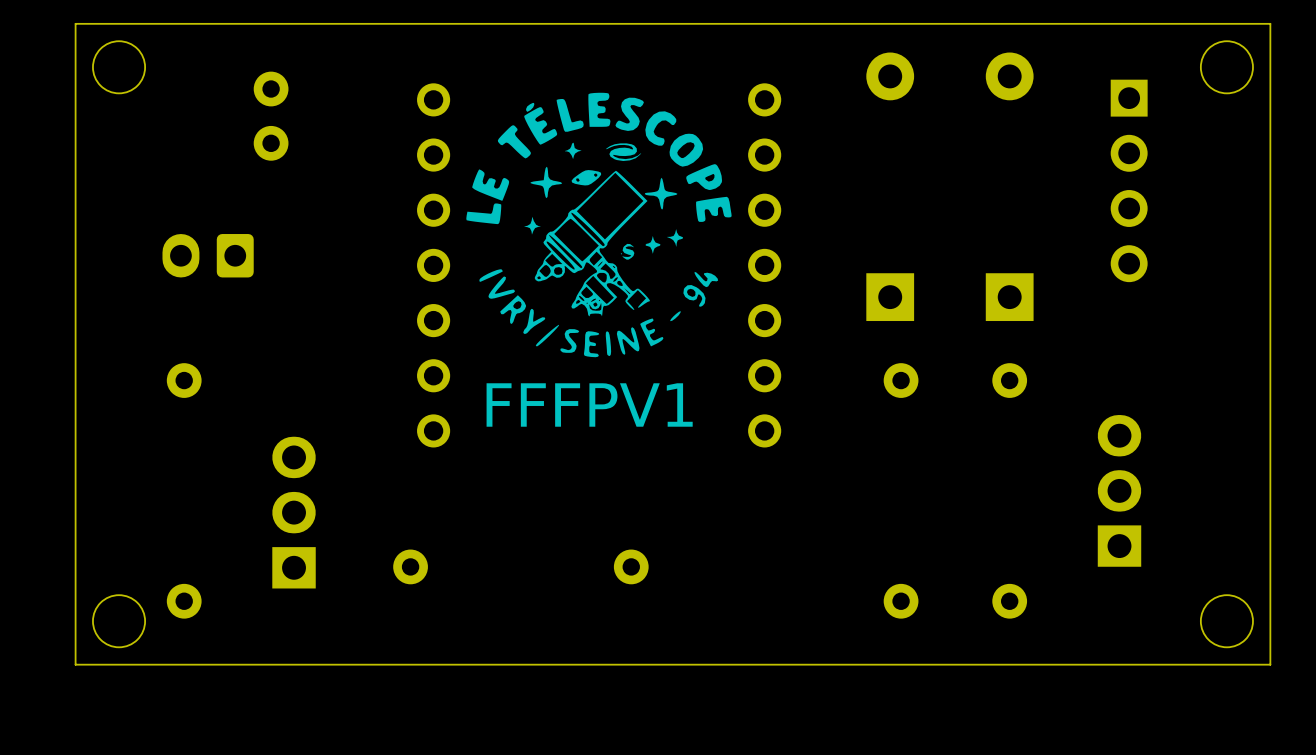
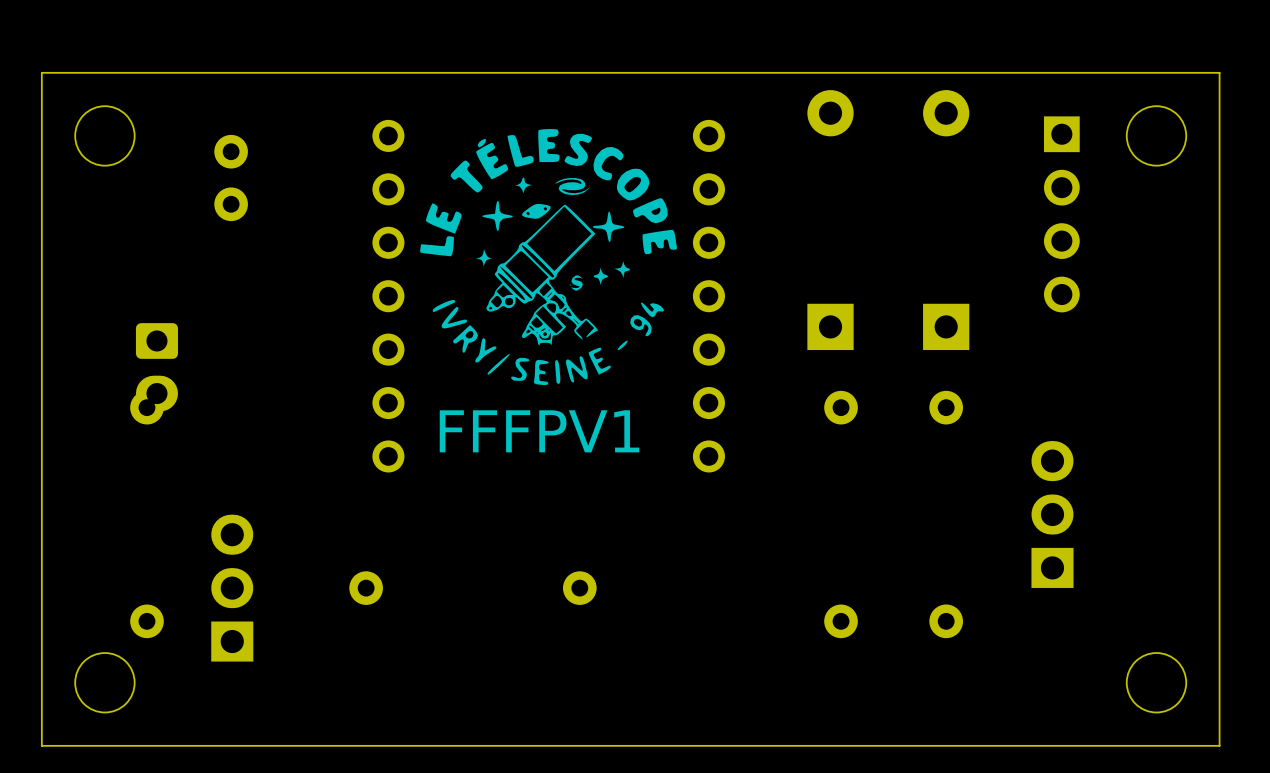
board edge: (75, 34) (75, 23) (1270, 23) (1270, 664) (75, 664) -> (41, 72) (1219, 72) (1219, 745) (41, 745) (41, 682)
round board edge: [92, 40, 146, 94] -> none
round board edge: [1200, 40, 1254, 94] -> none
round board edge: none -> [74, 105, 136, 167]
round board edge: none -> [1126, 105, 1187, 167]
part position: (271, 116) -> (231, 177)
part rotation: 0° (208, 255) -> 90° counterclockwise (156, 367)
part position: (208, 255) -> (156, 367)
part position: (294, 512) -> (232, 588)
round board edge: [92, 594, 146, 648] -> none
round board edge: [1200, 594, 1254, 648] -> none
round board edge: none -> [74, 652, 136, 714]
round board edge: none -> [1126, 652, 1187, 714]

